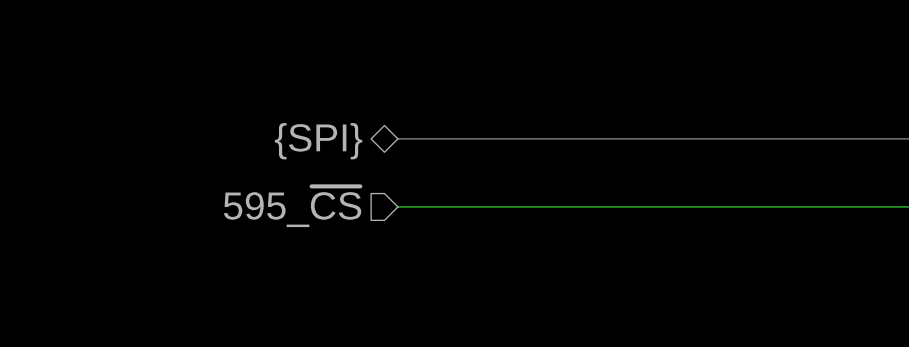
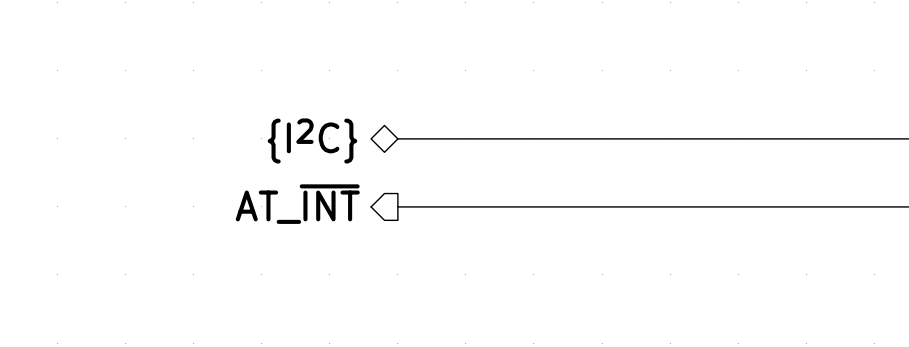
hierarchical label: {SPI} (318, 141) -> {I2C} (312, 140)
hierarchical label shape: input (292, 206) -> output (297, 204)
hierarchical label: 595_~{CS} (292, 206) -> AT_~{INT} (297, 204)

